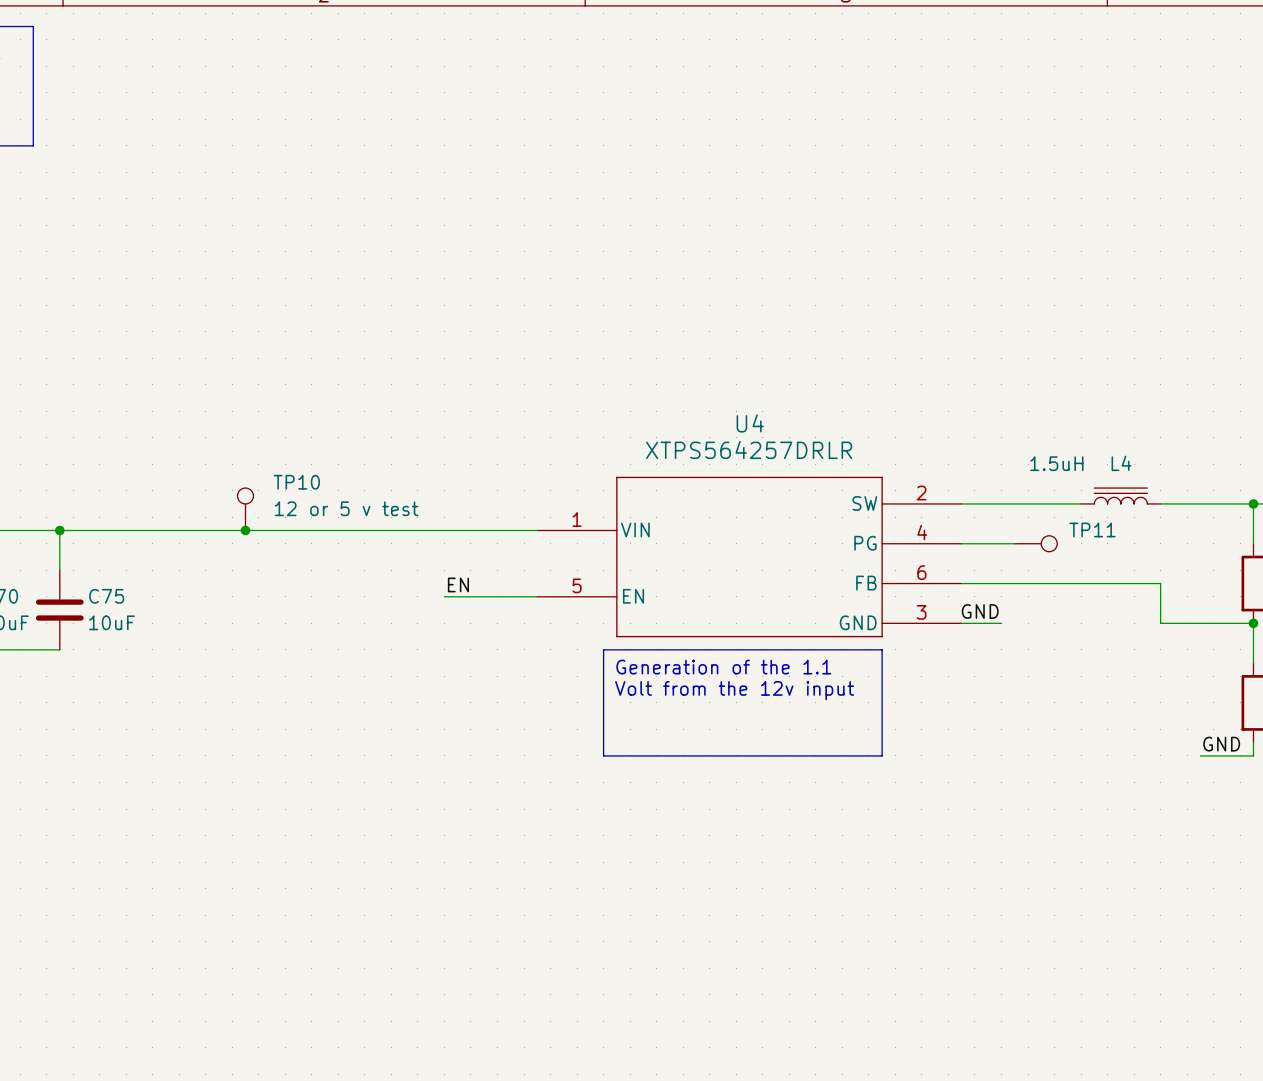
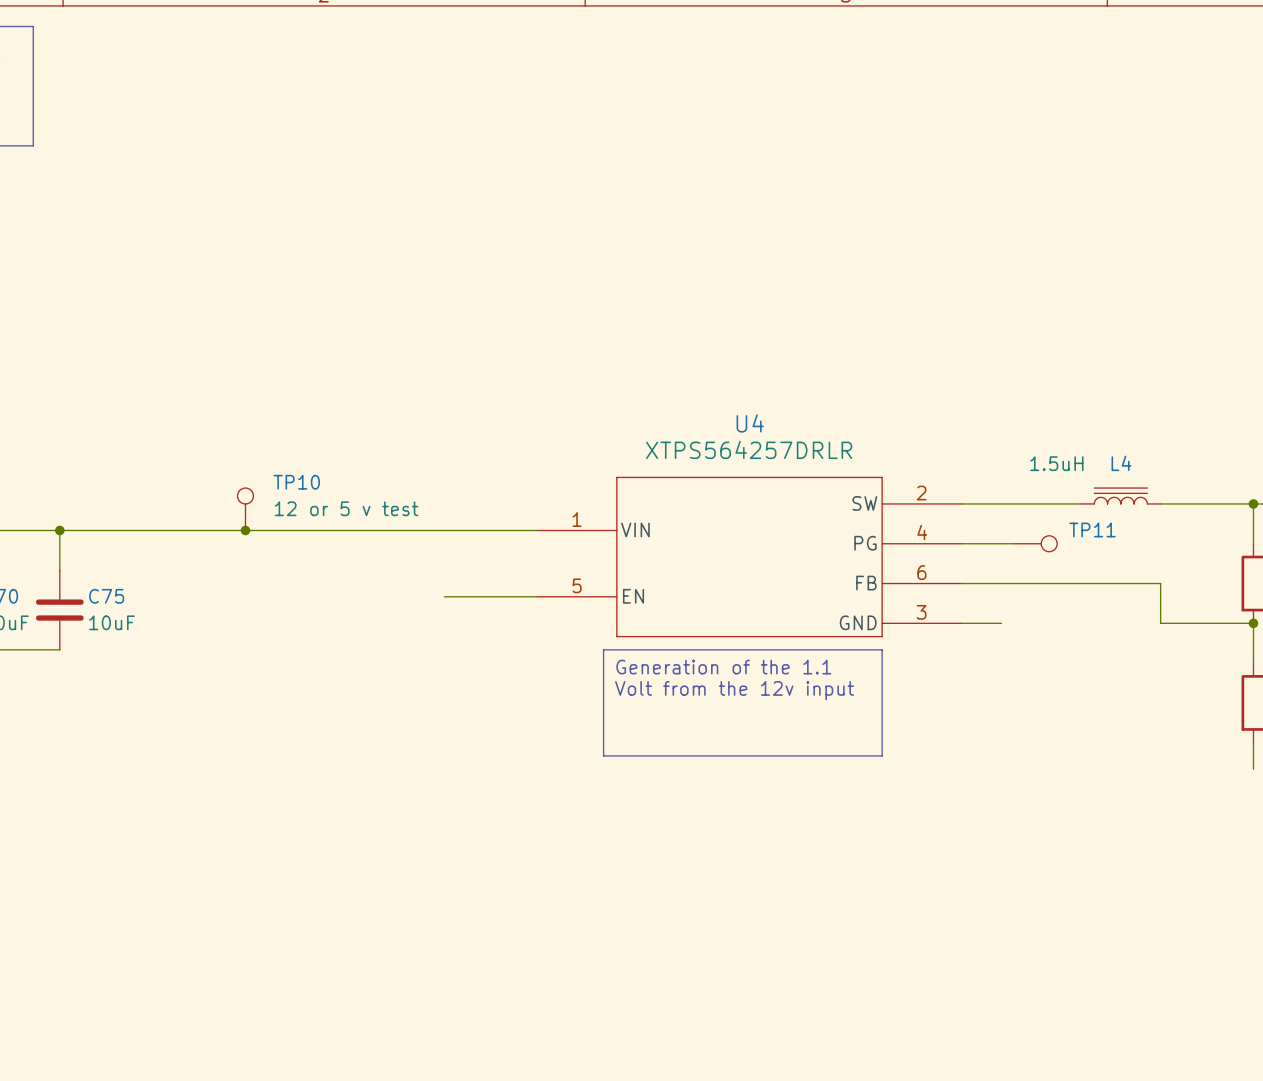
label: EN (458, 584) -> none
label: GND (980, 611) -> none
label: GND (1221, 744) -> none
wire: (1200, 755) (1253, 755) -> (1253, 769) (1253, 755)

